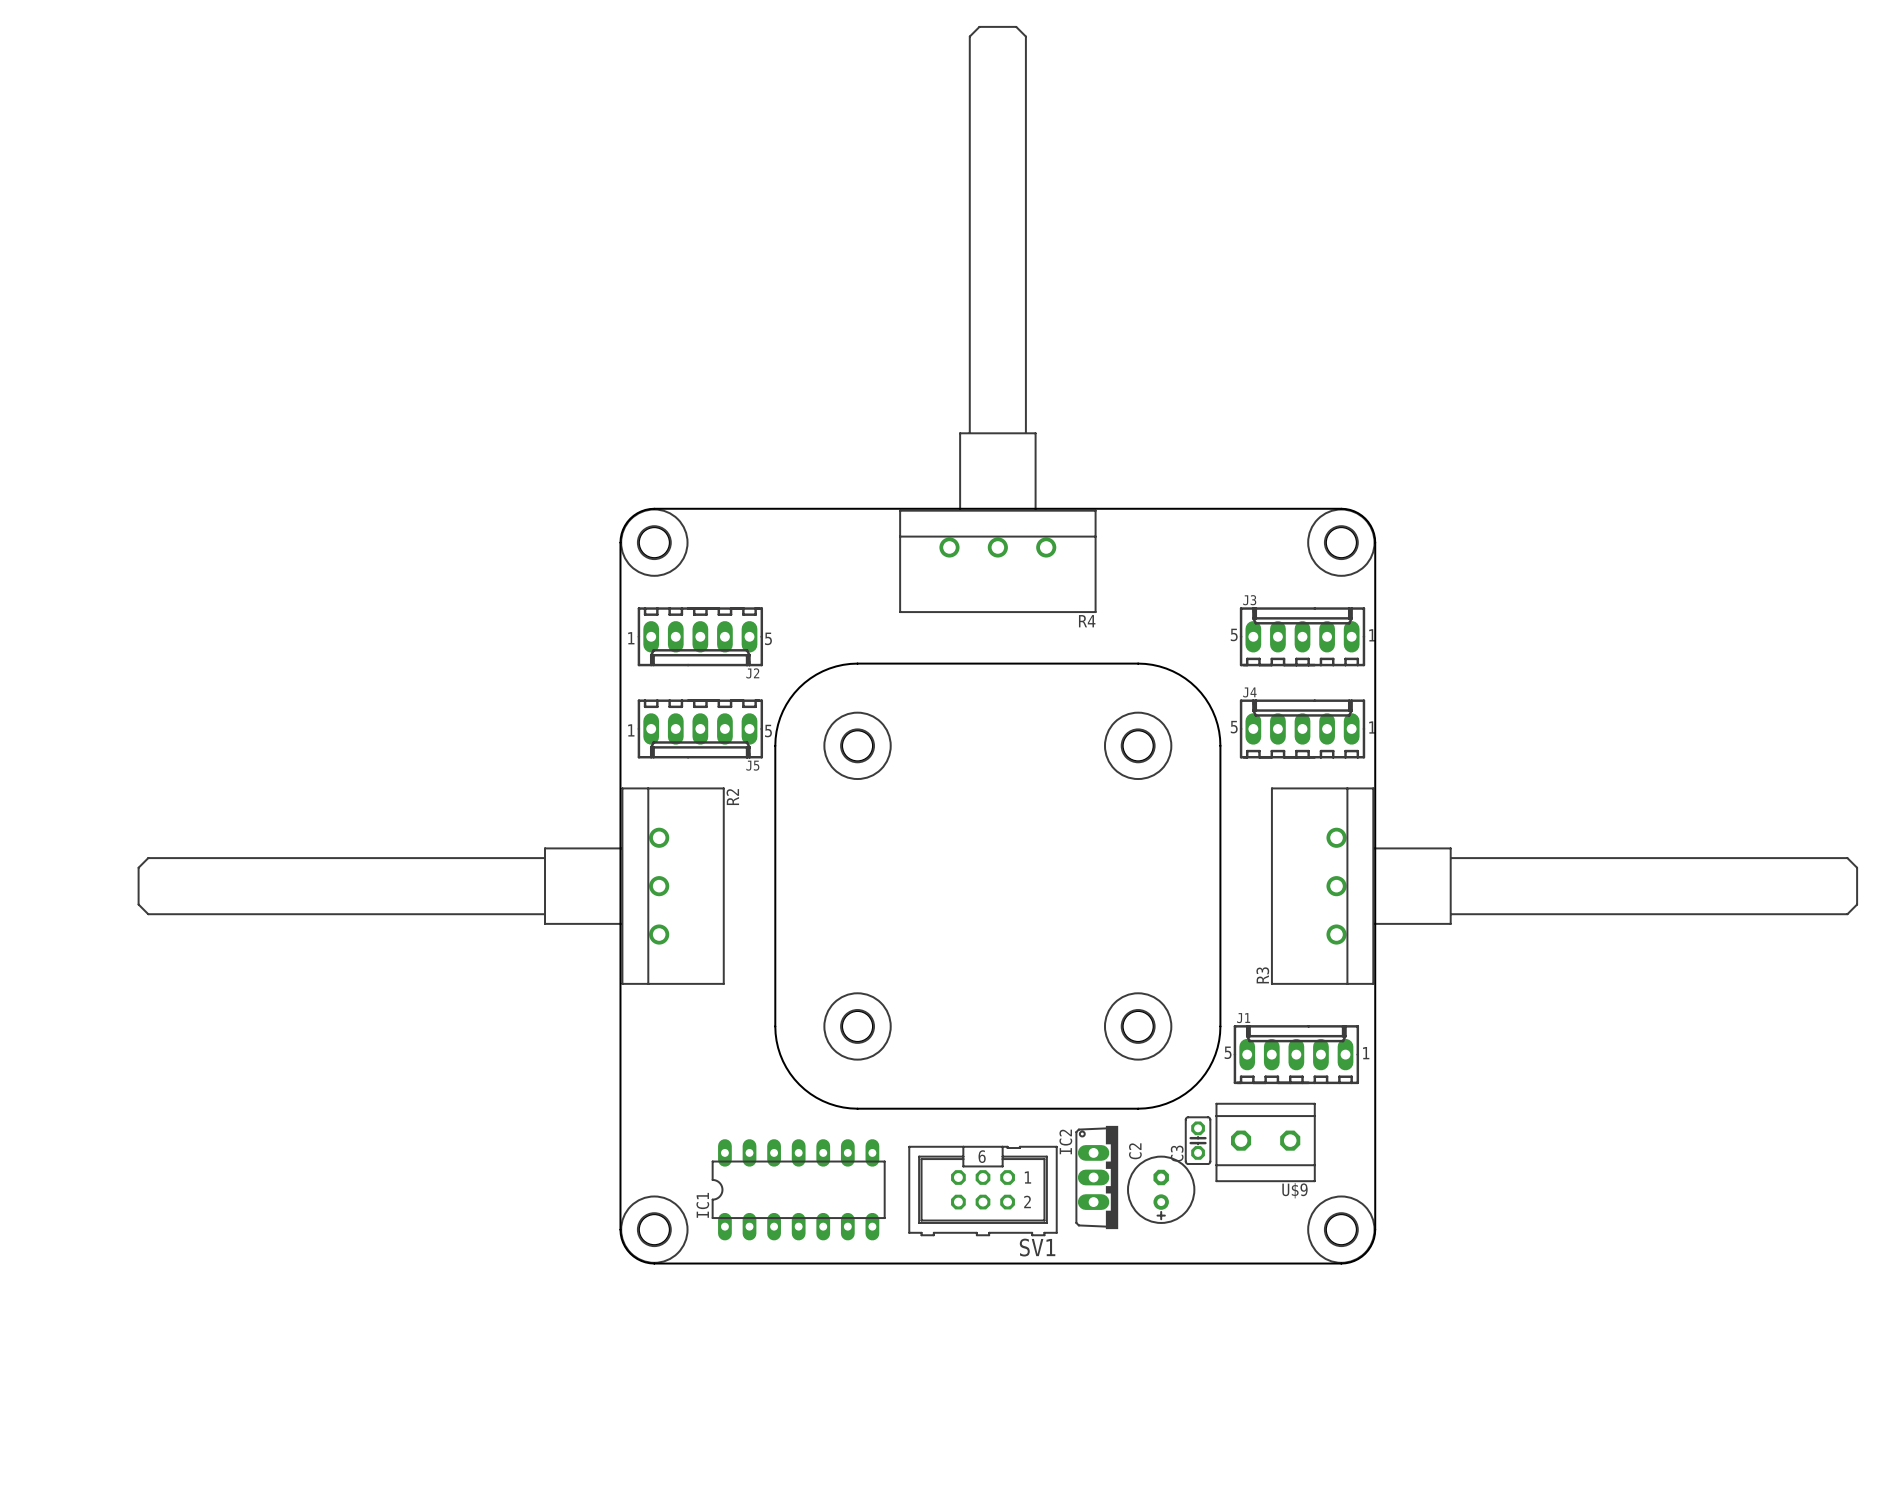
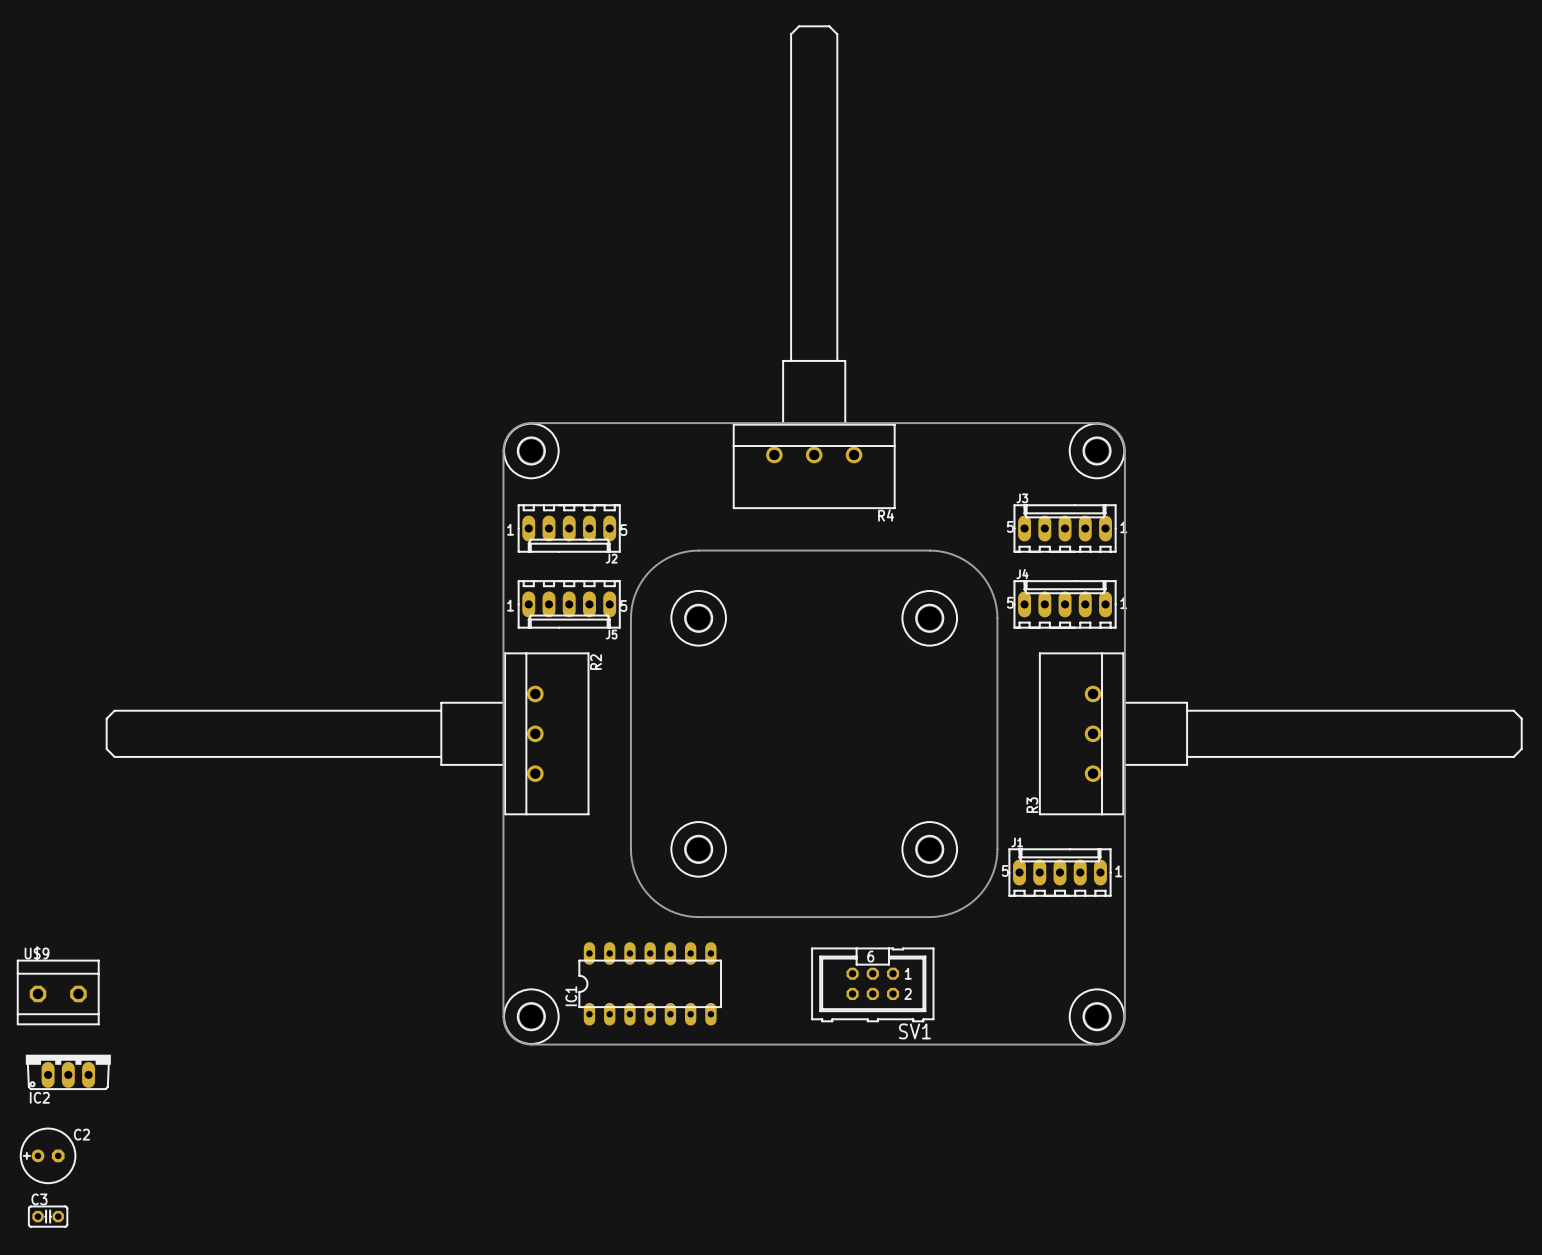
C3 rotation: 0° (1198, 1140) -> 90° clockwise (48, 1216)
C3 position: (1198, 1140) -> (48, 1216)
U$9 rotation: 0° (1265, 1142) -> 180° (58, 992)
U$9 position: (1265, 1142) -> (58, 992)
IC2 rotation: 0° (1096, 1177) -> 90° counterclockwise (68, 1072)
IC2 position: (1096, 1177) -> (68, 1072)
C2 rotation: 0° (1161, 1189) -> 90° clockwise (48, 1155)
C2 position: (1161, 1189) -> (48, 1155)
SV1 position: (983, 1191) -> (872, 984)

